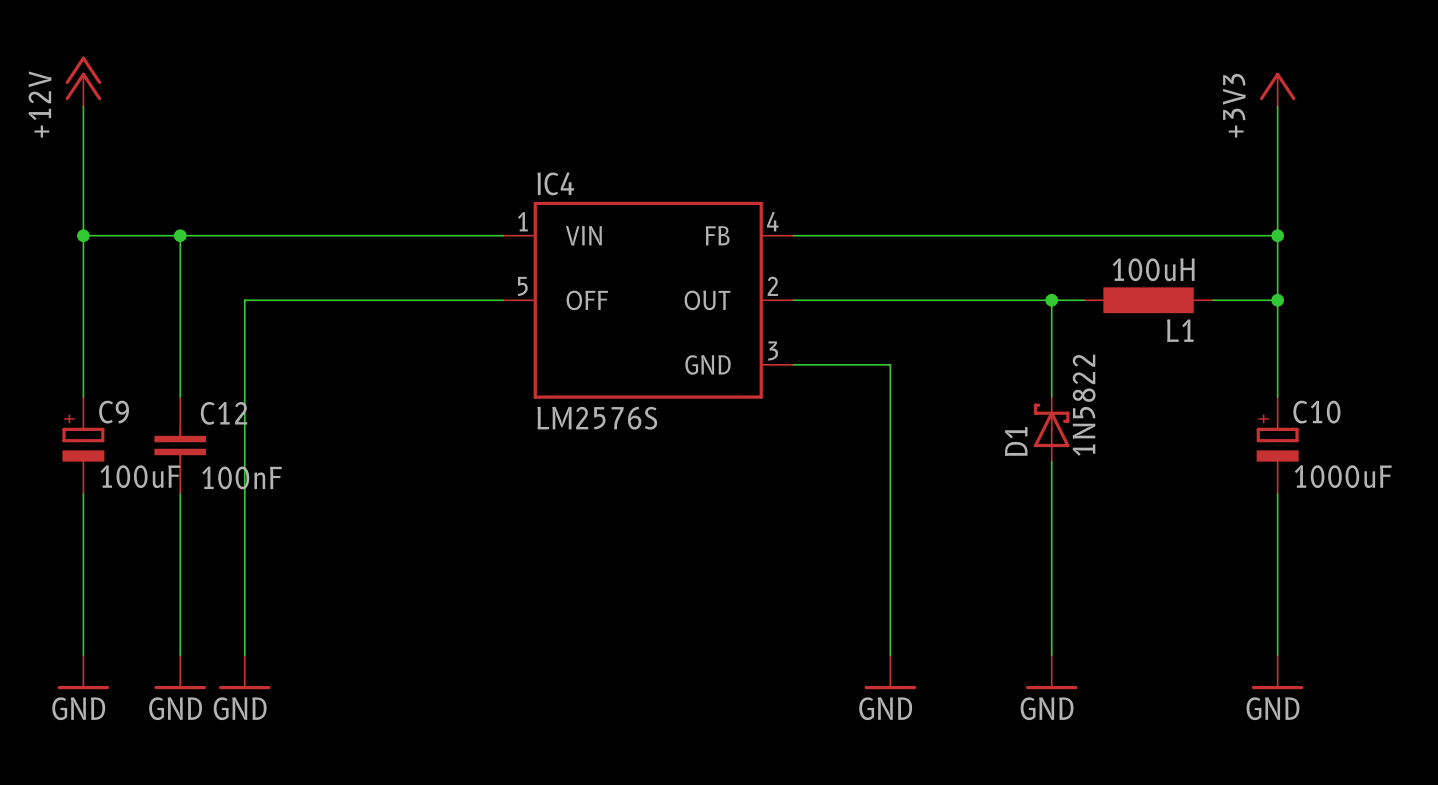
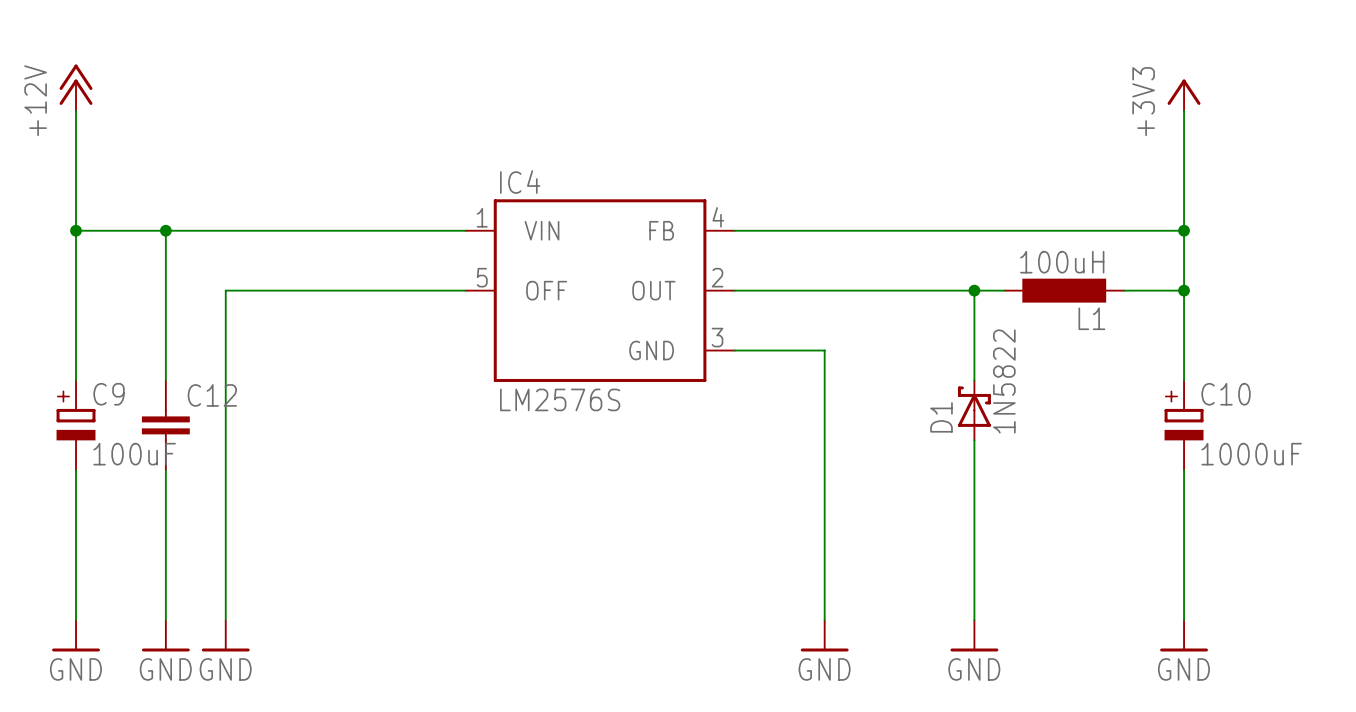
C12 value: 100nF (242, 477) -> none

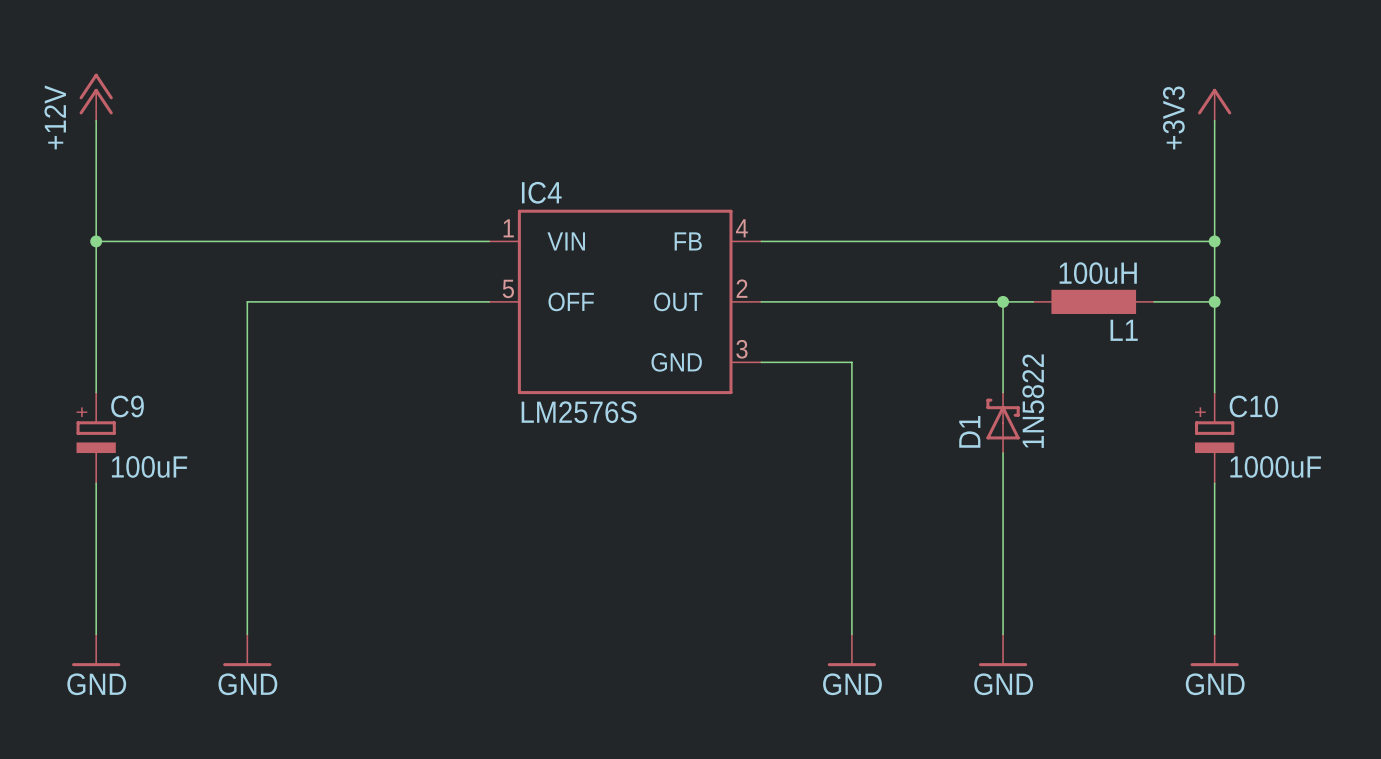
wire: (165, 230) (165, 380) -> none
junction: (165, 230) -> none
C12: (165, 425) -> none
wire: (165, 470) (165, 620) -> none
power symbol: GND (165, 635) -> none

